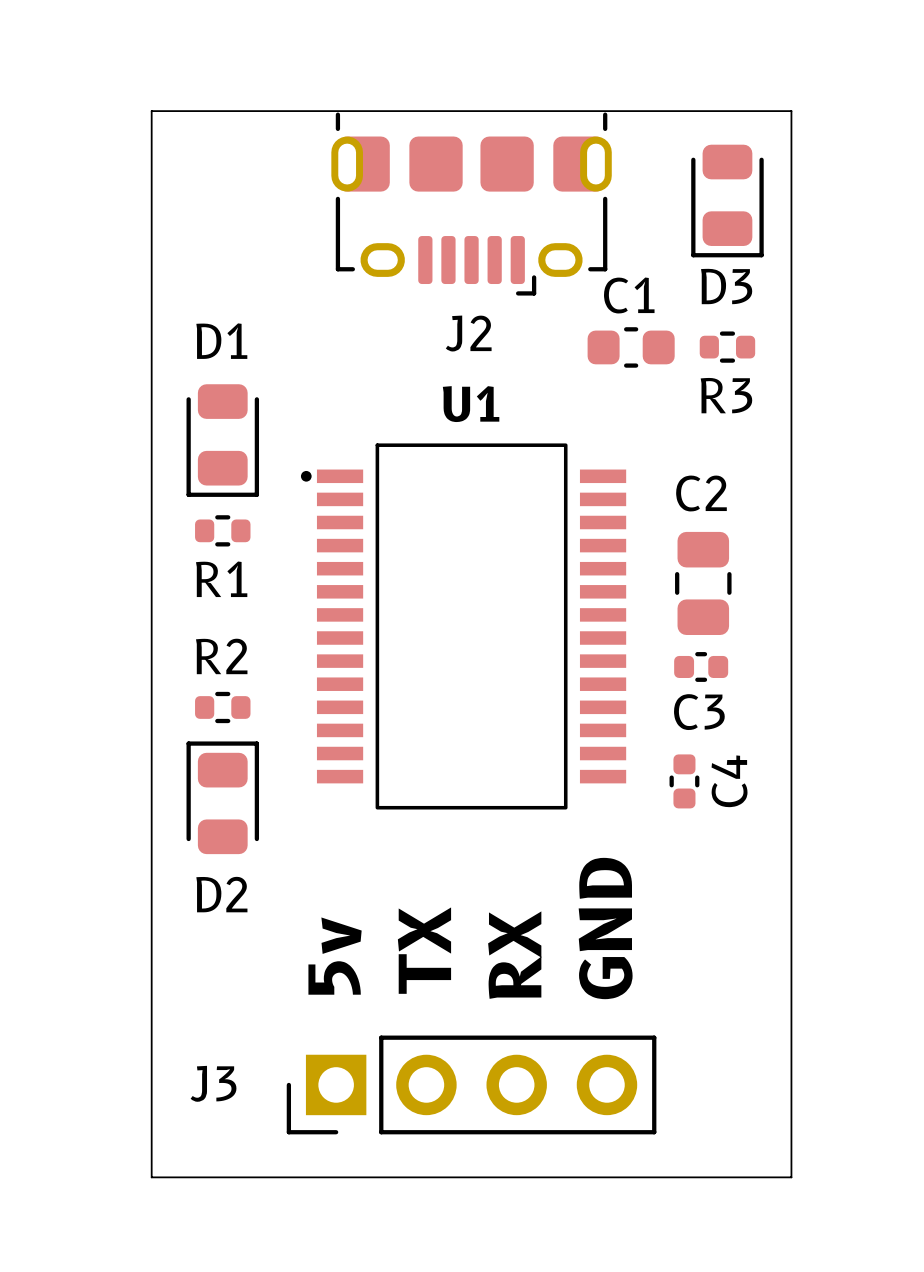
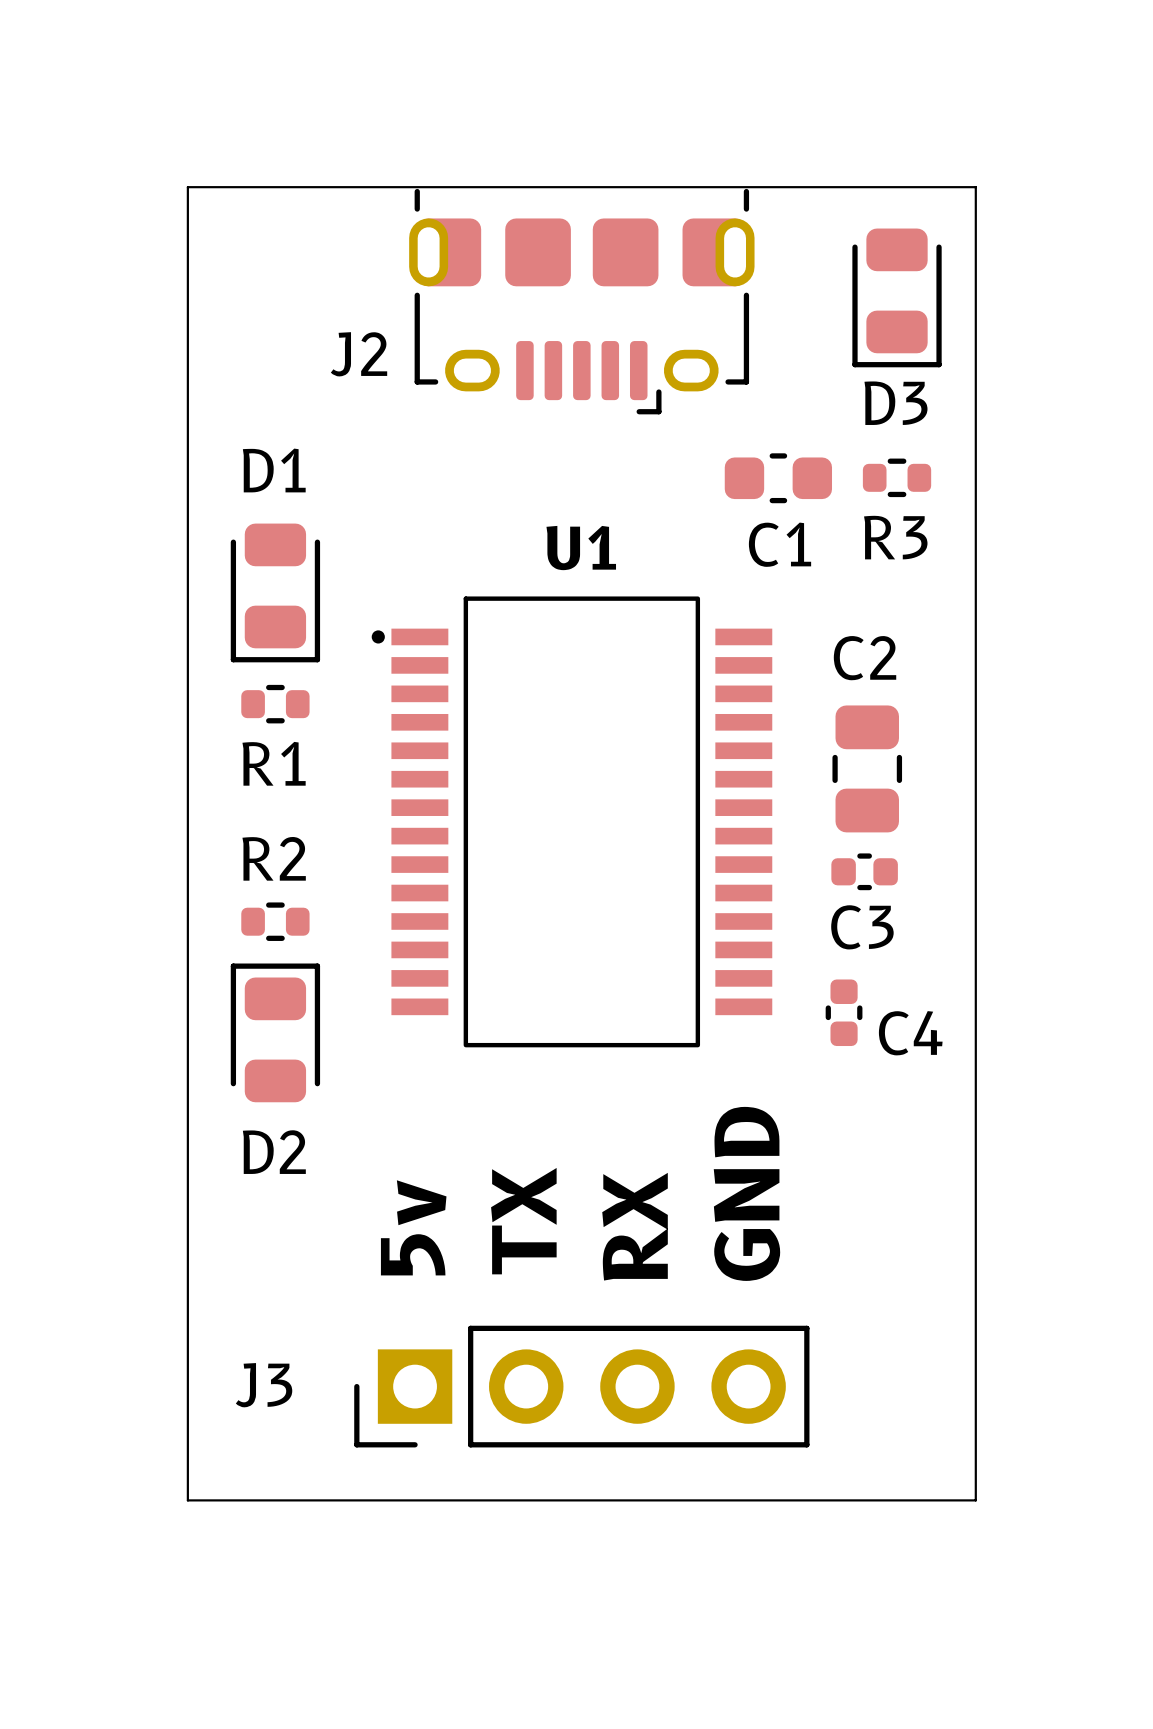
C1 name position: C1 (629, 295) -> C1 (780, 544)
J2 name position: J2 (468, 333) -> J2 (359, 354)
C4 name rotation: 0° (729, 781) -> 90° clockwise (910, 1033)

